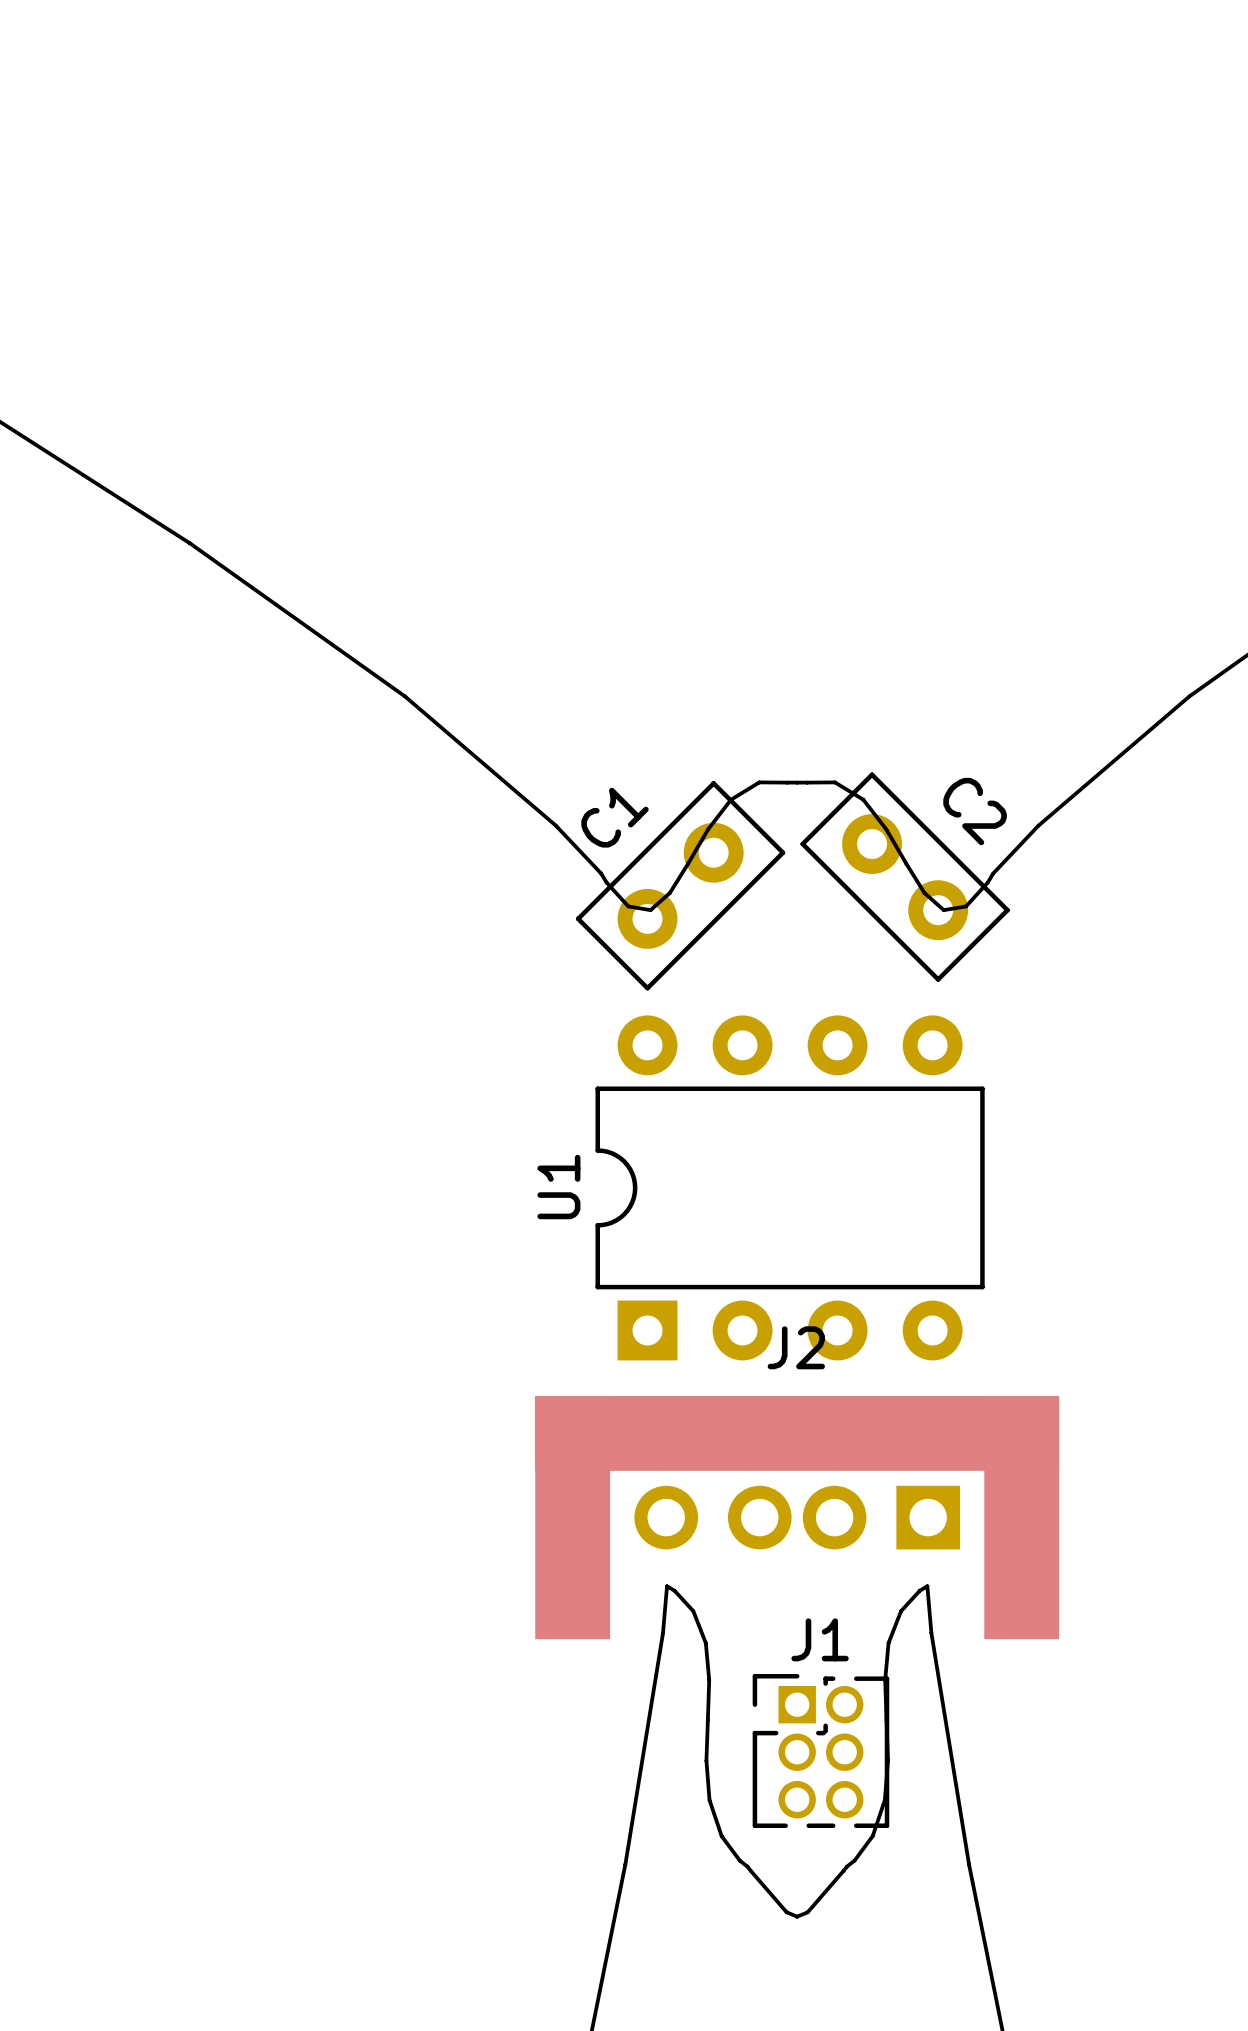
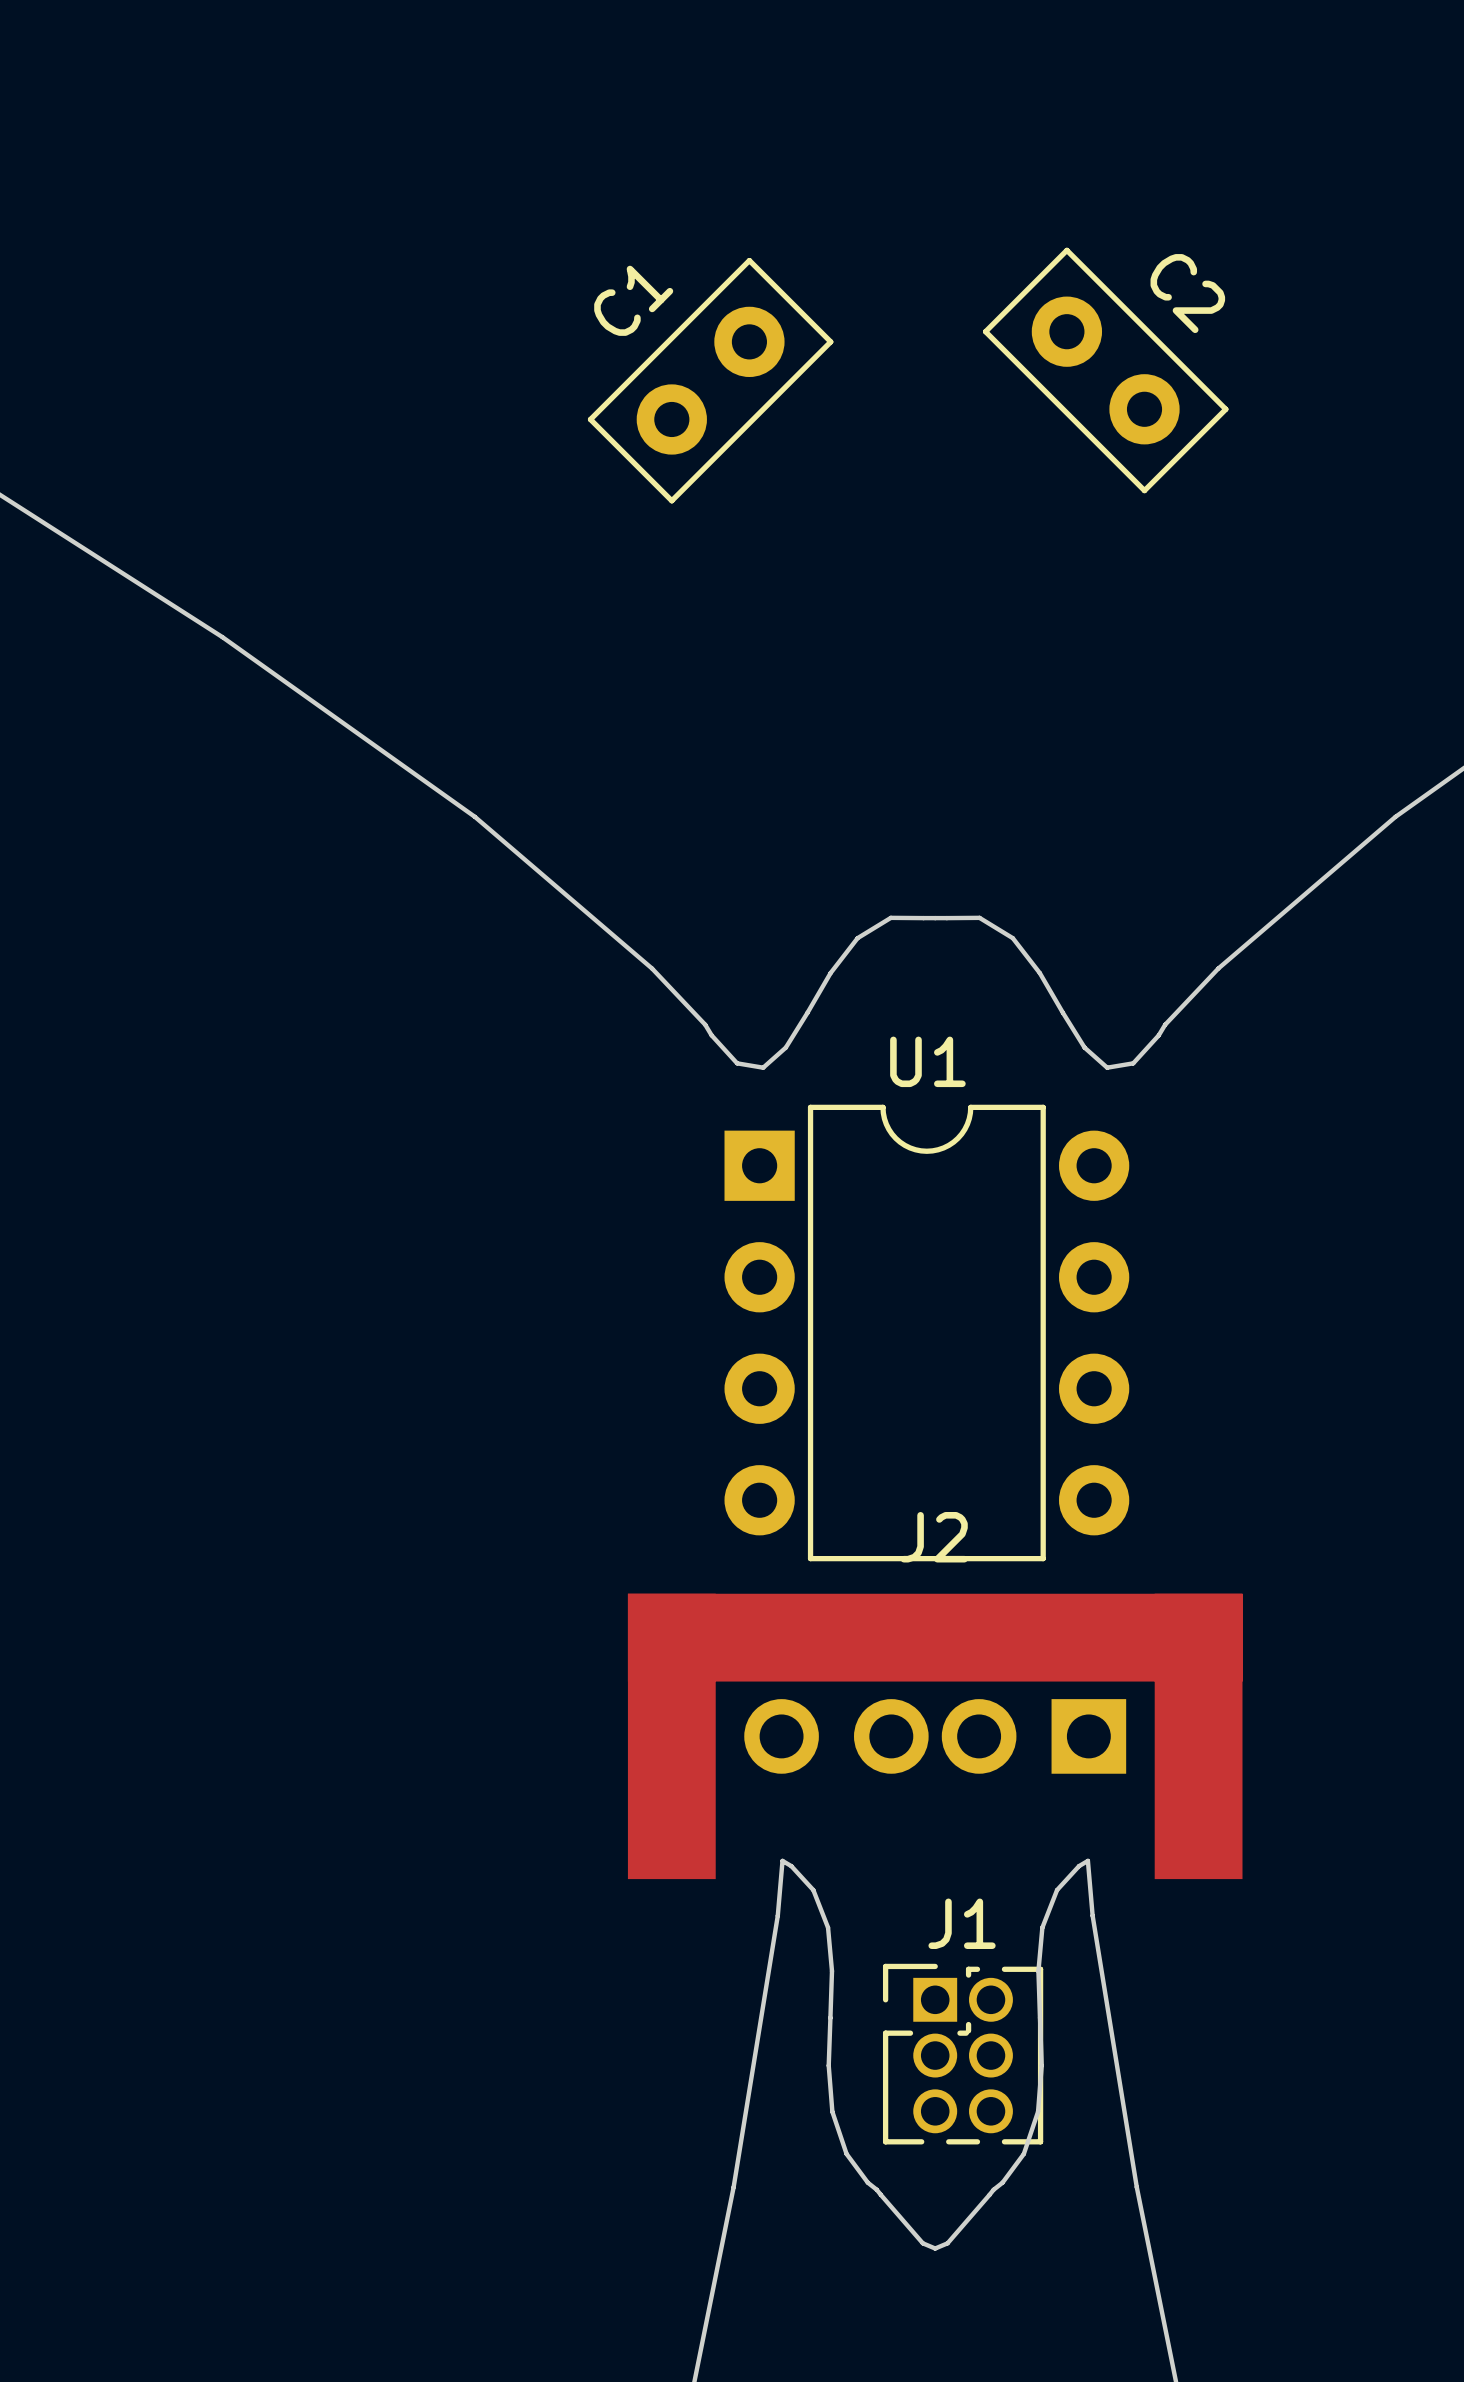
C2 position: (905, 877) -> (1105, 370)
C1 position: (680, 885) -> (710, 380)
U1 rotation: 0° (790, 1187) -> 90° clockwise (926, 1333)
J2 position: (797, 1517) -> (935, 1736)

